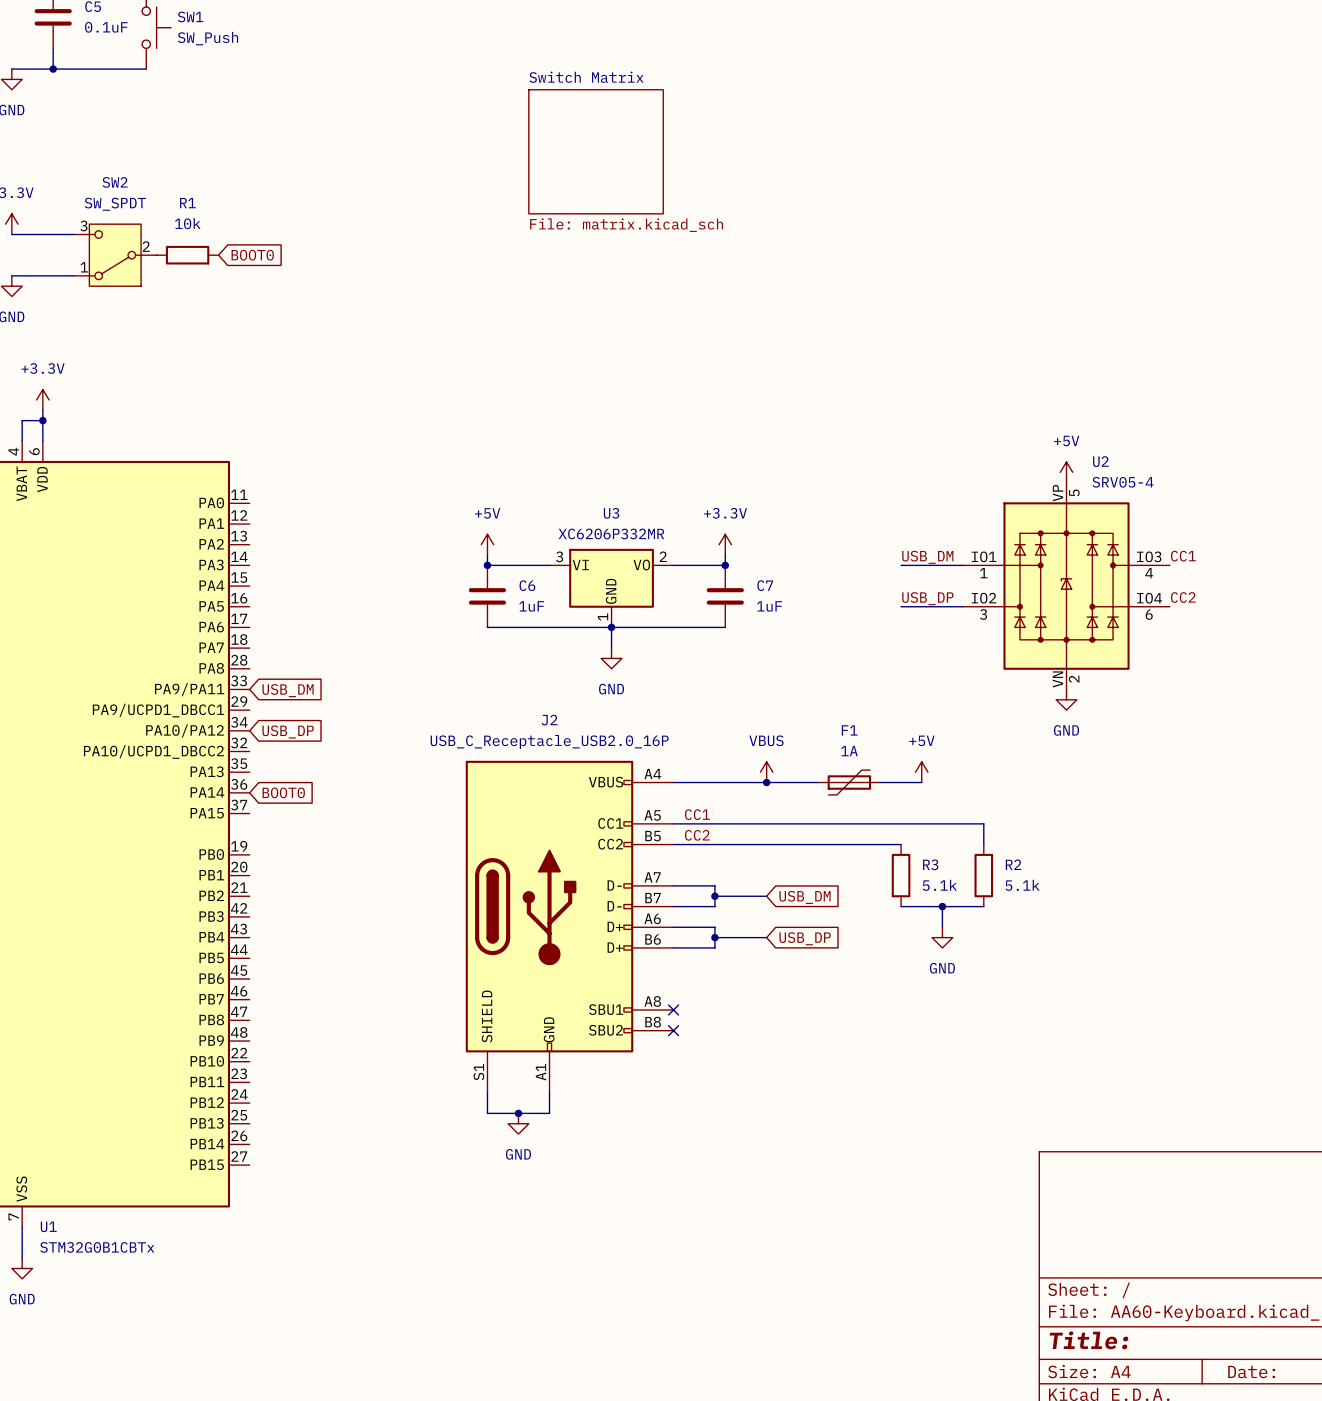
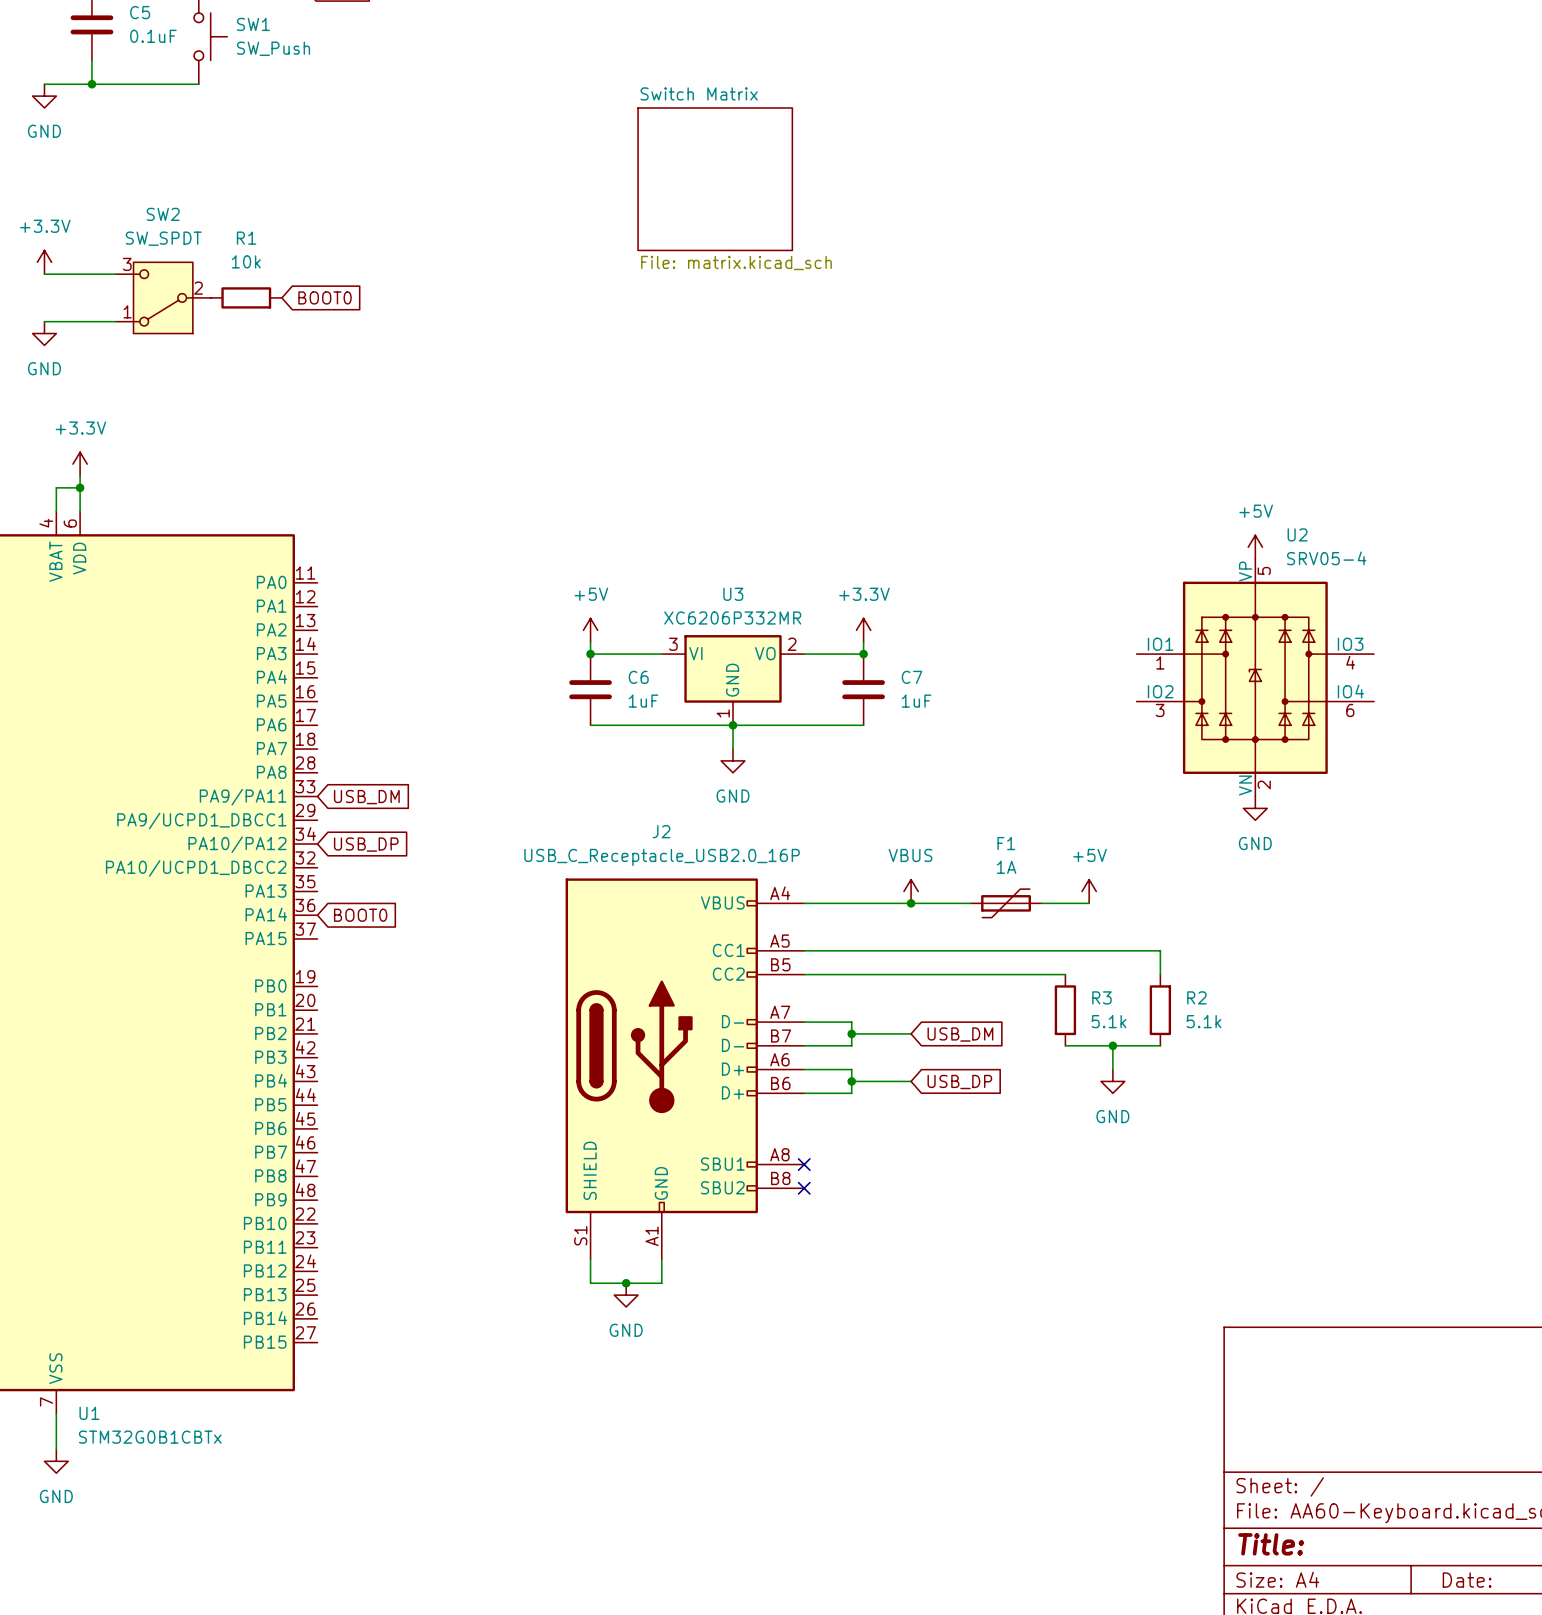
label: CC1 (1183, 556) -> none
label: USB_DM (927, 557) -> none
wire: (901, 565) (963, 565) -> none
label: CC2 (1183, 597) -> none
label: USB_DP (927, 598) -> none
wire: (901, 606) (963, 606) -> none
label: CC1 (697, 814) -> none
label: CC2 (697, 835) -> none

